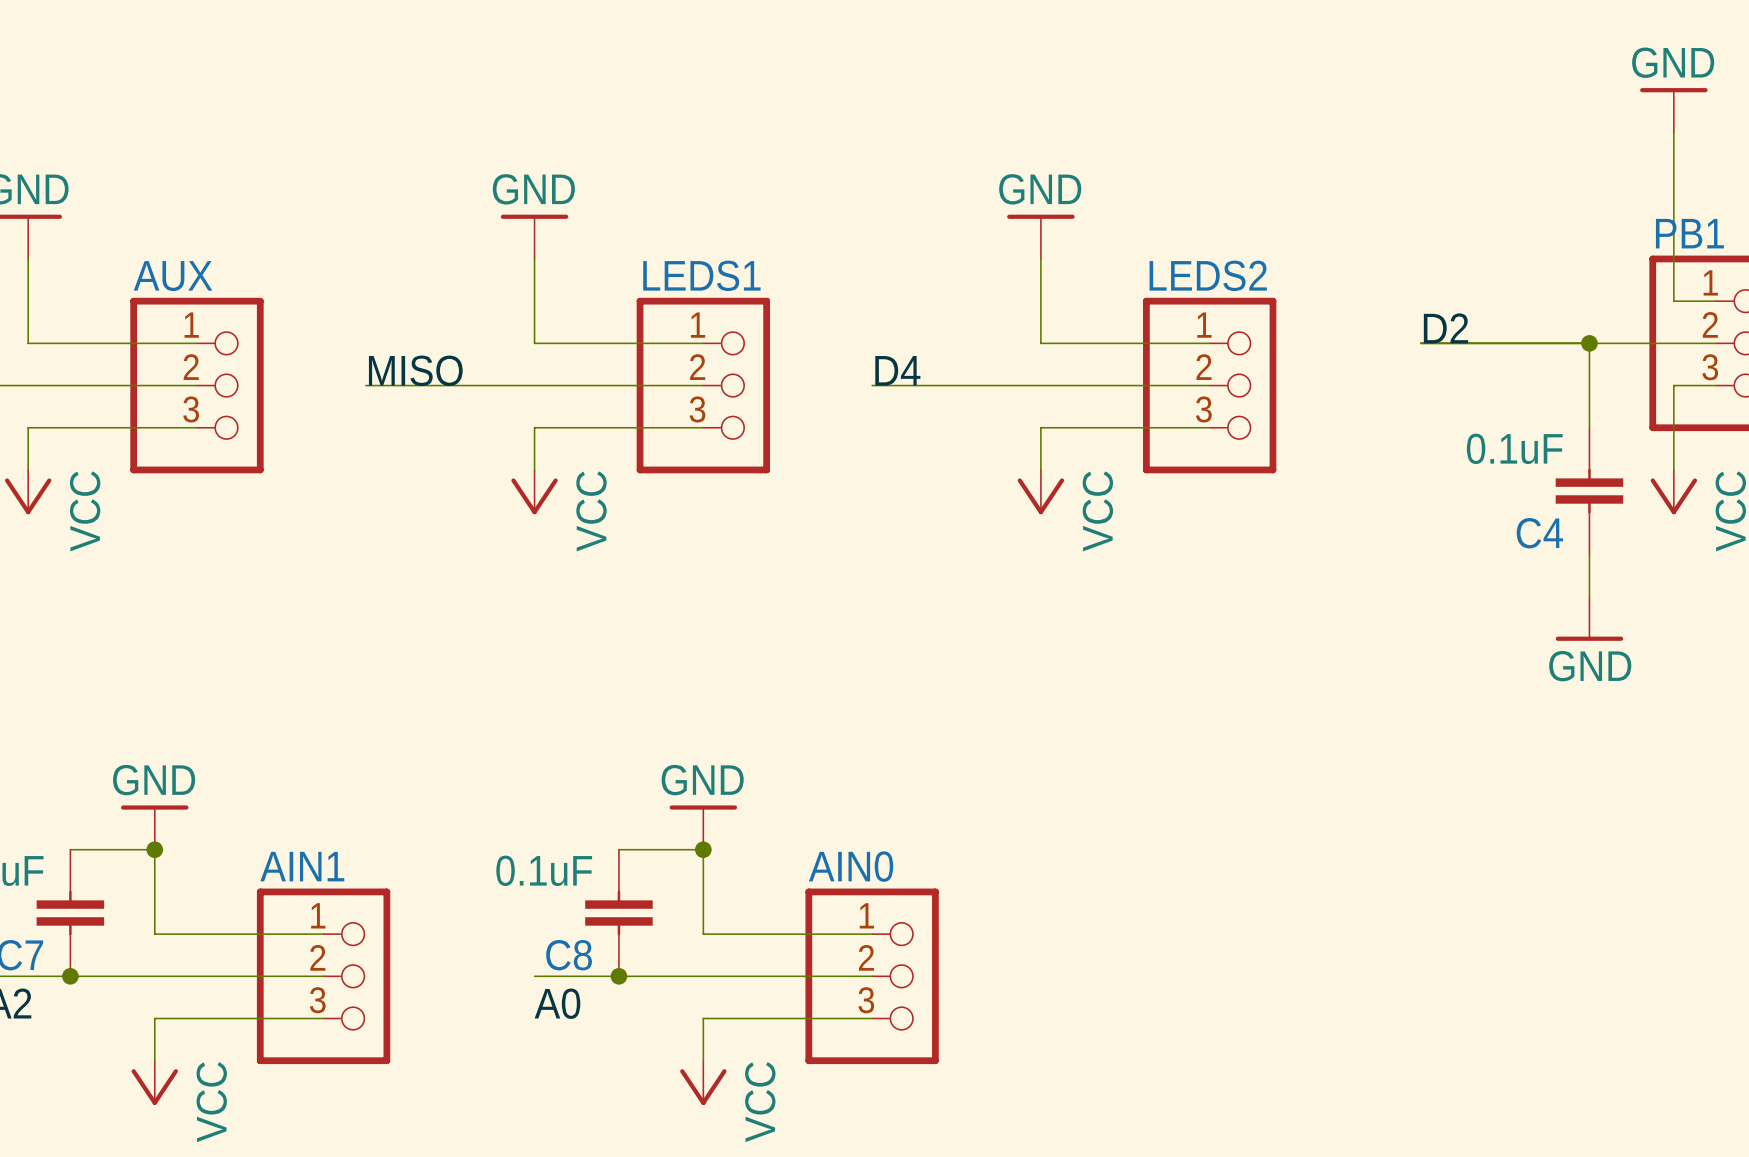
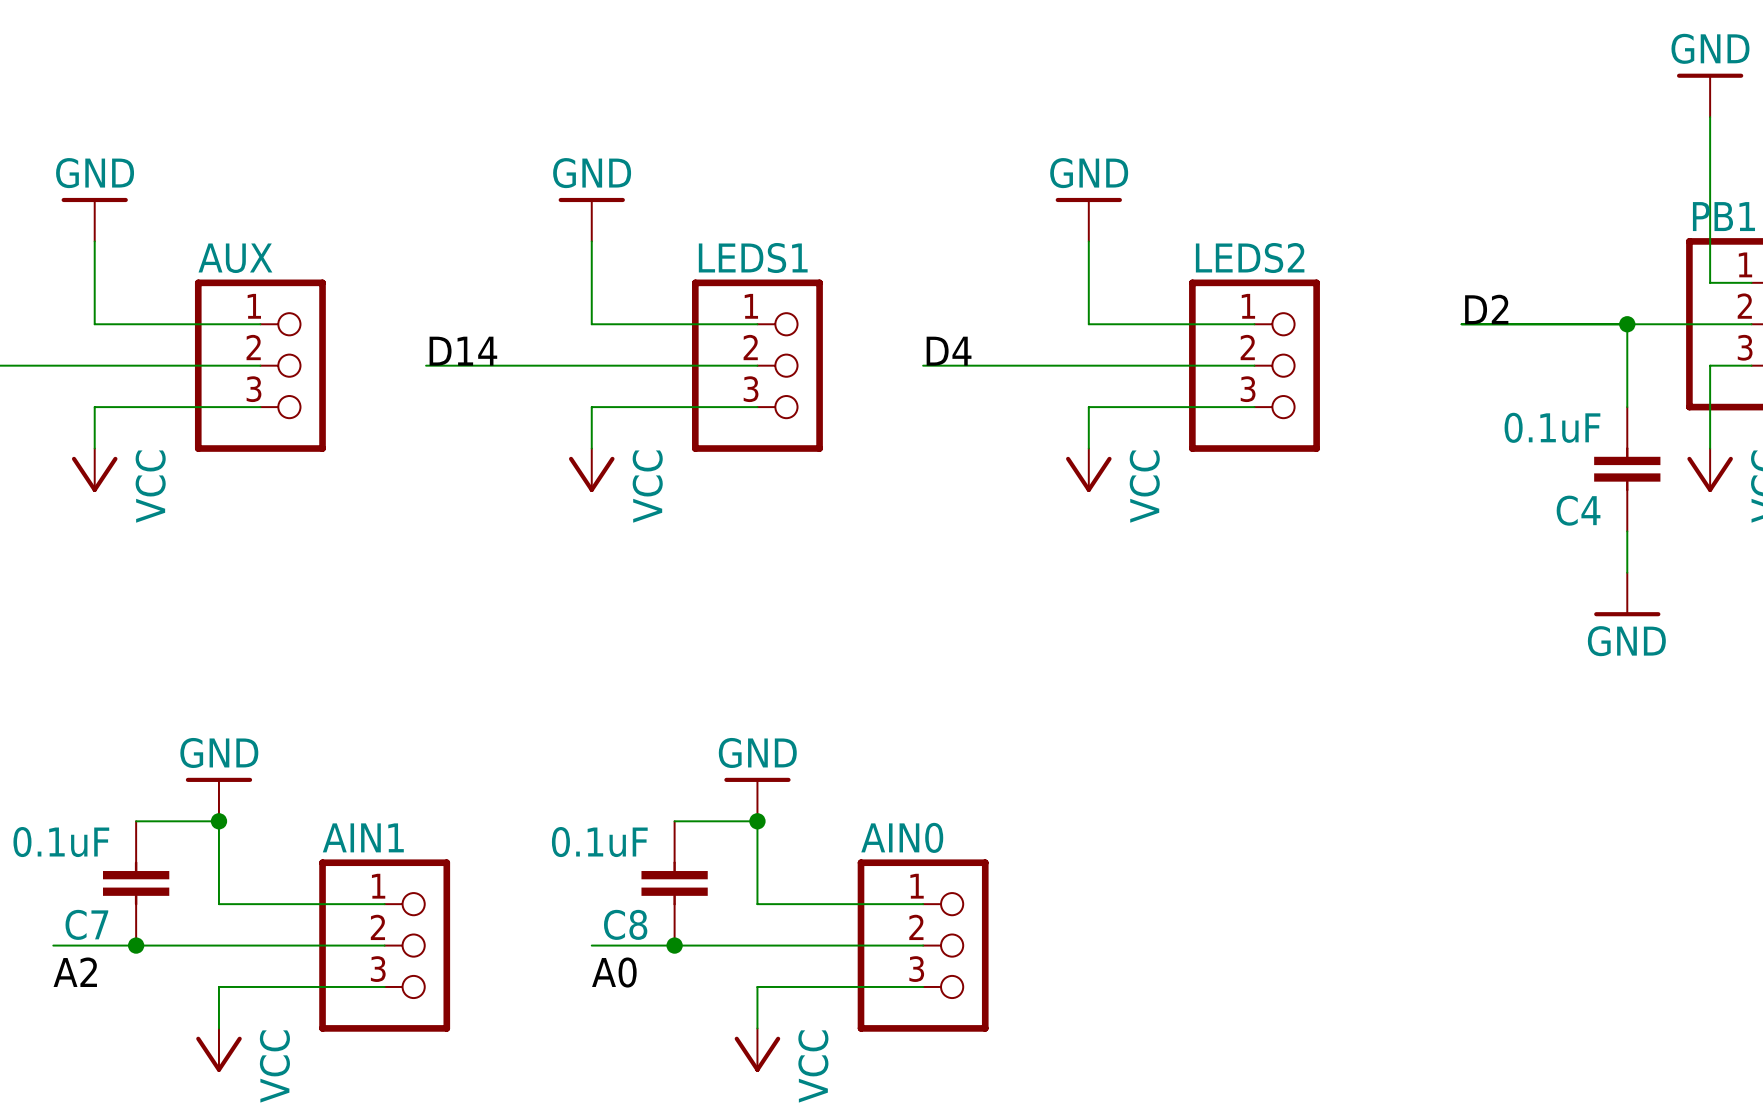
label: MISO (415, 370) -> D14 (463, 351)

